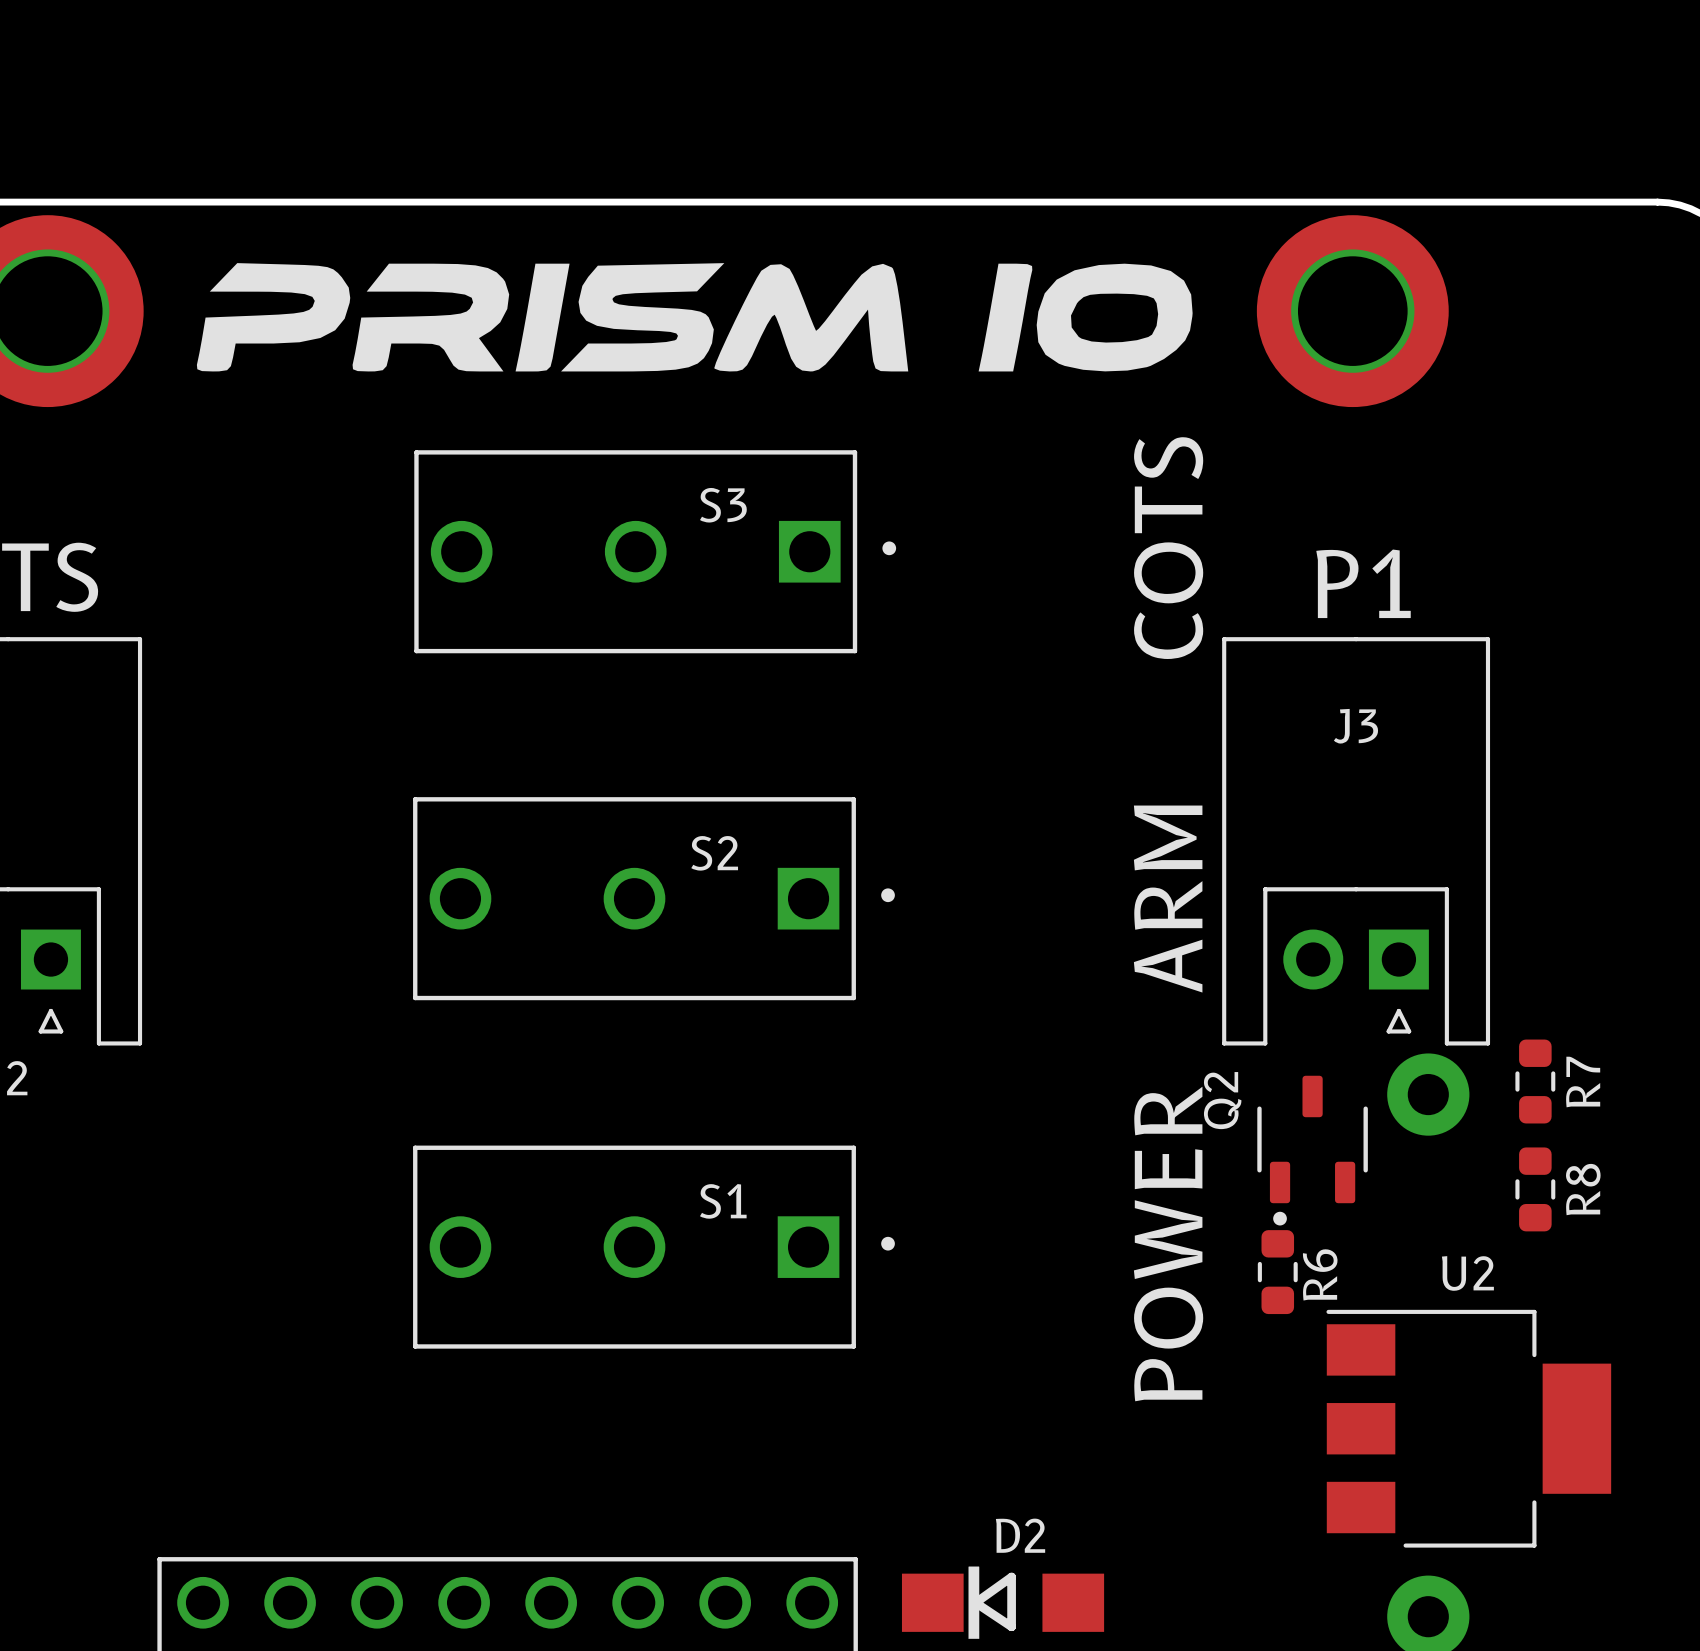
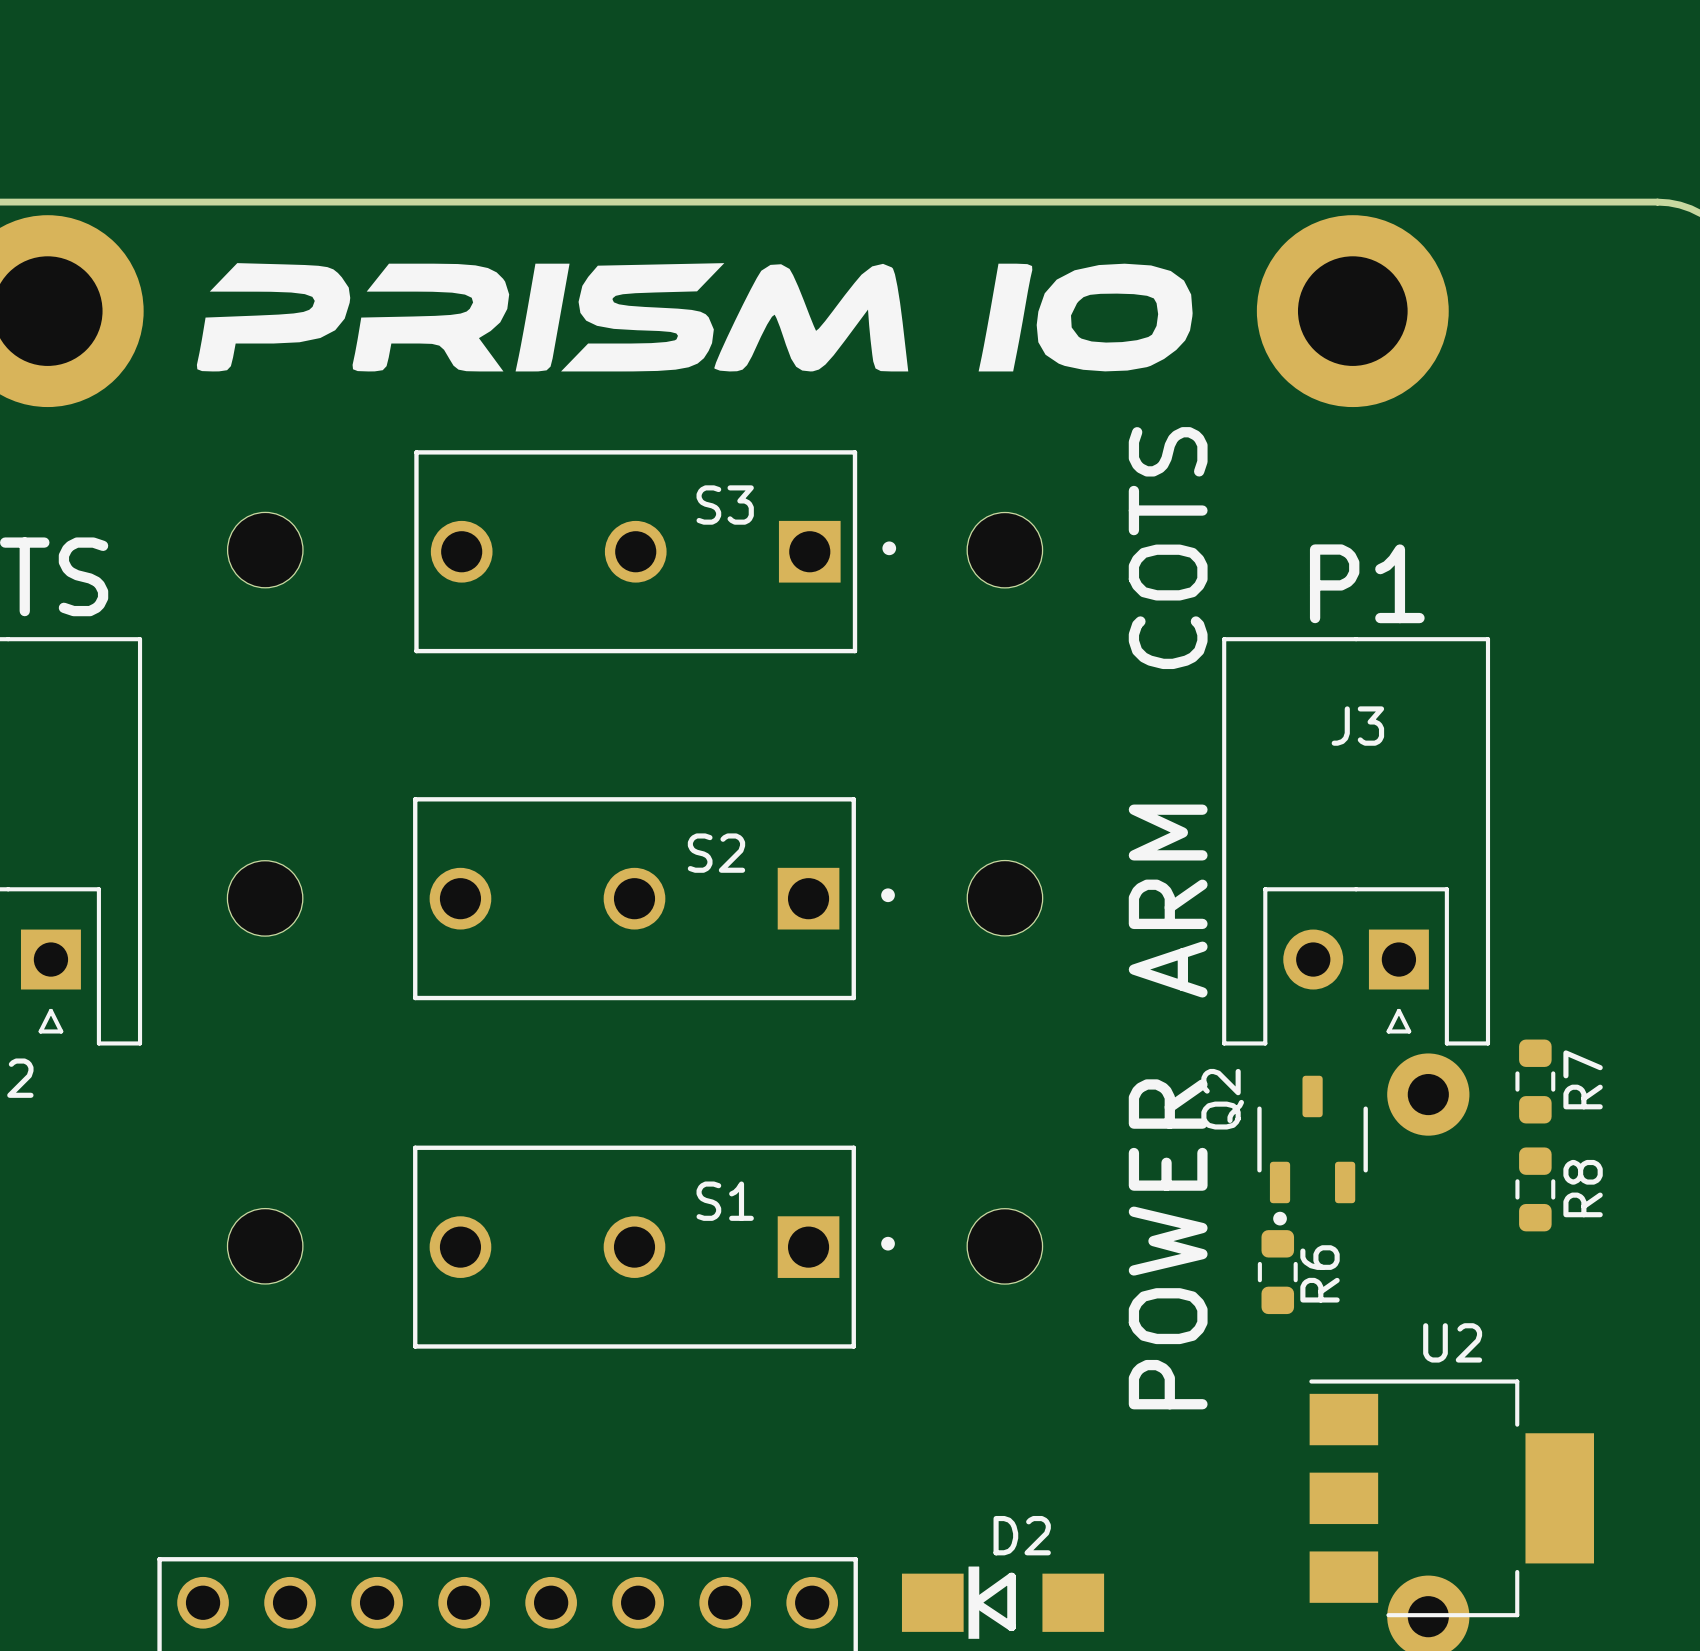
part: none -> (265, 550)
part: none -> (1004, 550)
part: none -> (265, 898)
part: none -> (1004, 898)
part: none -> (265, 1246)
part: none -> (1004, 1246)
U2 position: (1468, 1428) -> (1451, 1498)

